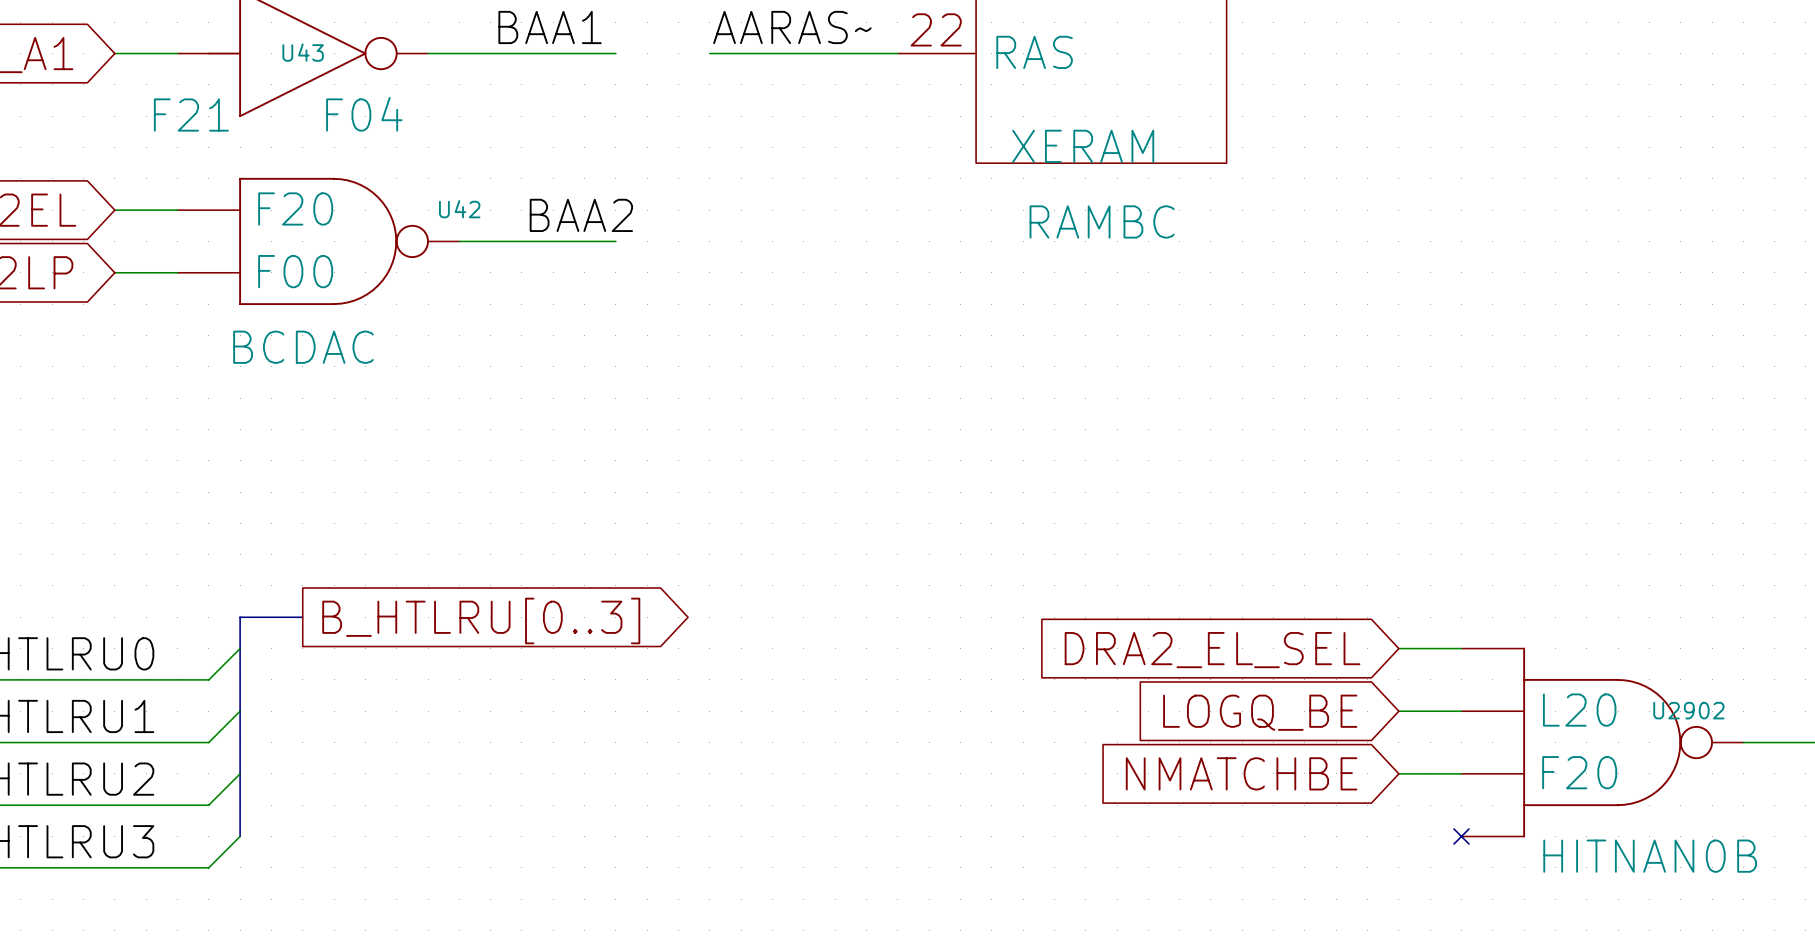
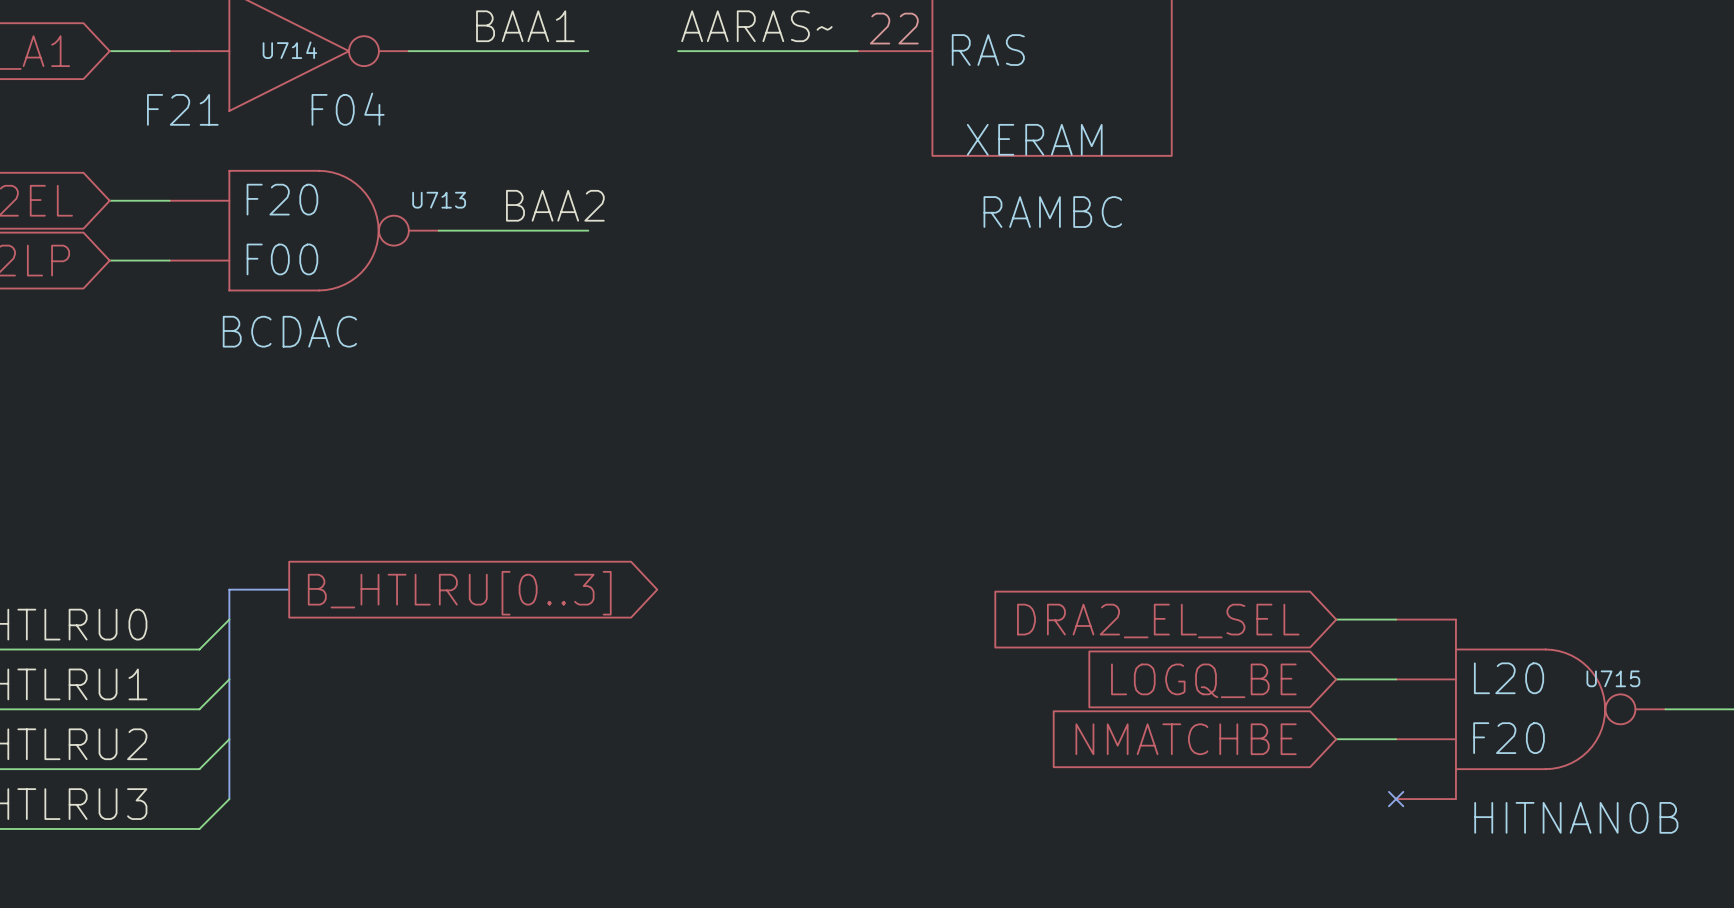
U43 name: U43 (303, 52) -> U714 (289, 50)
U42 name: U42 (459, 209) -> U713 (439, 200)
U2902 name: U2902 (1688, 710) -> U715 (1613, 678)

